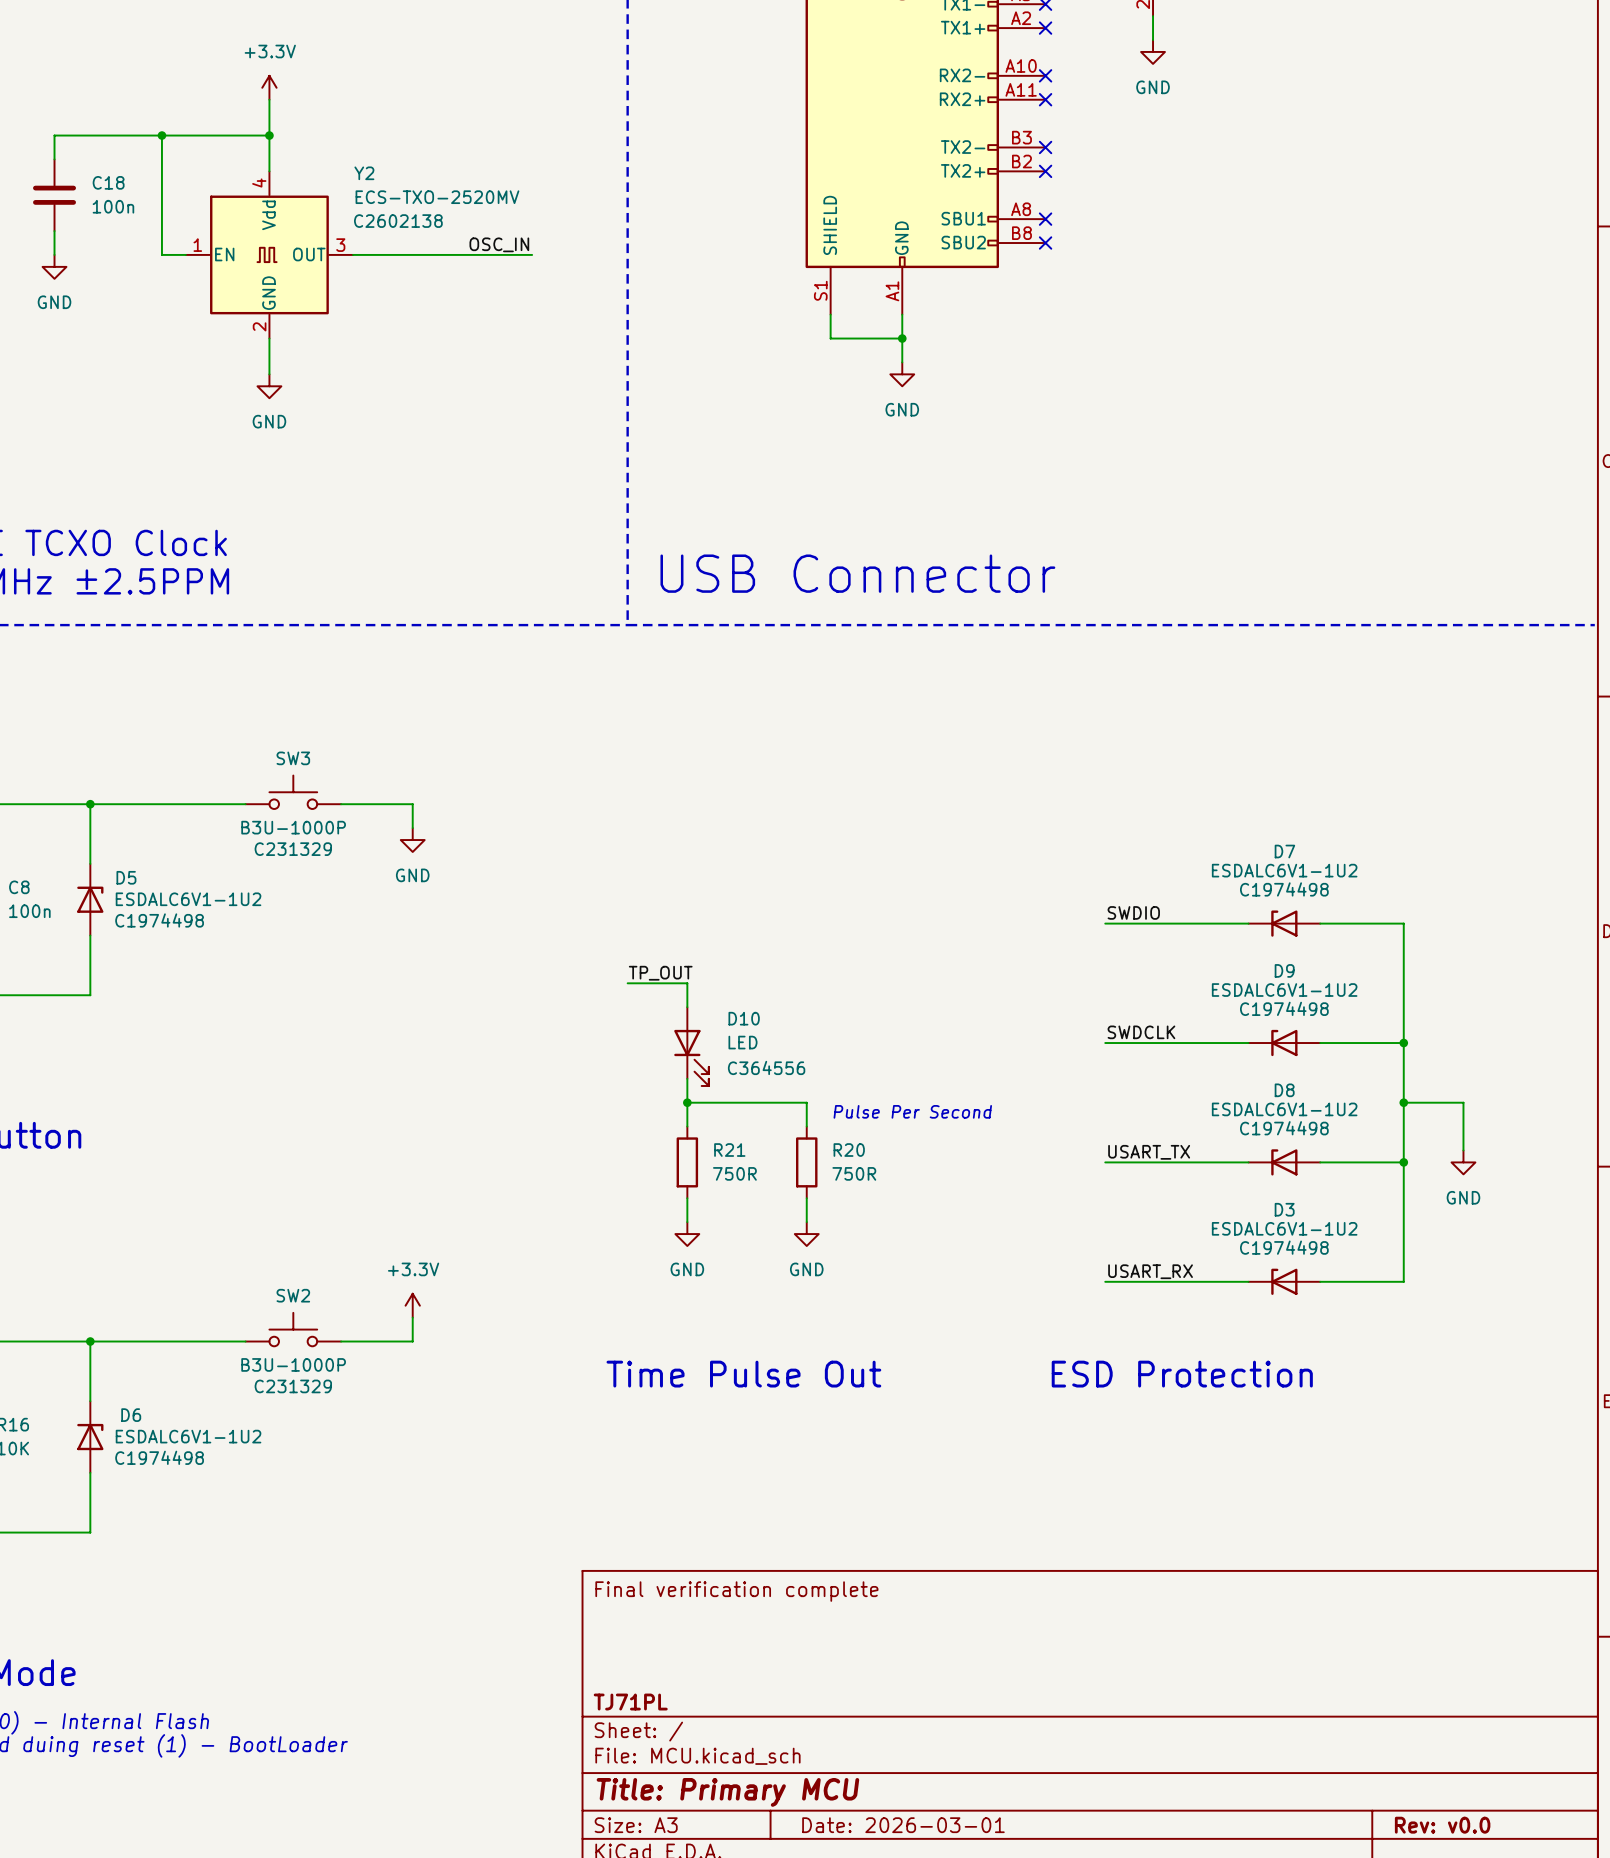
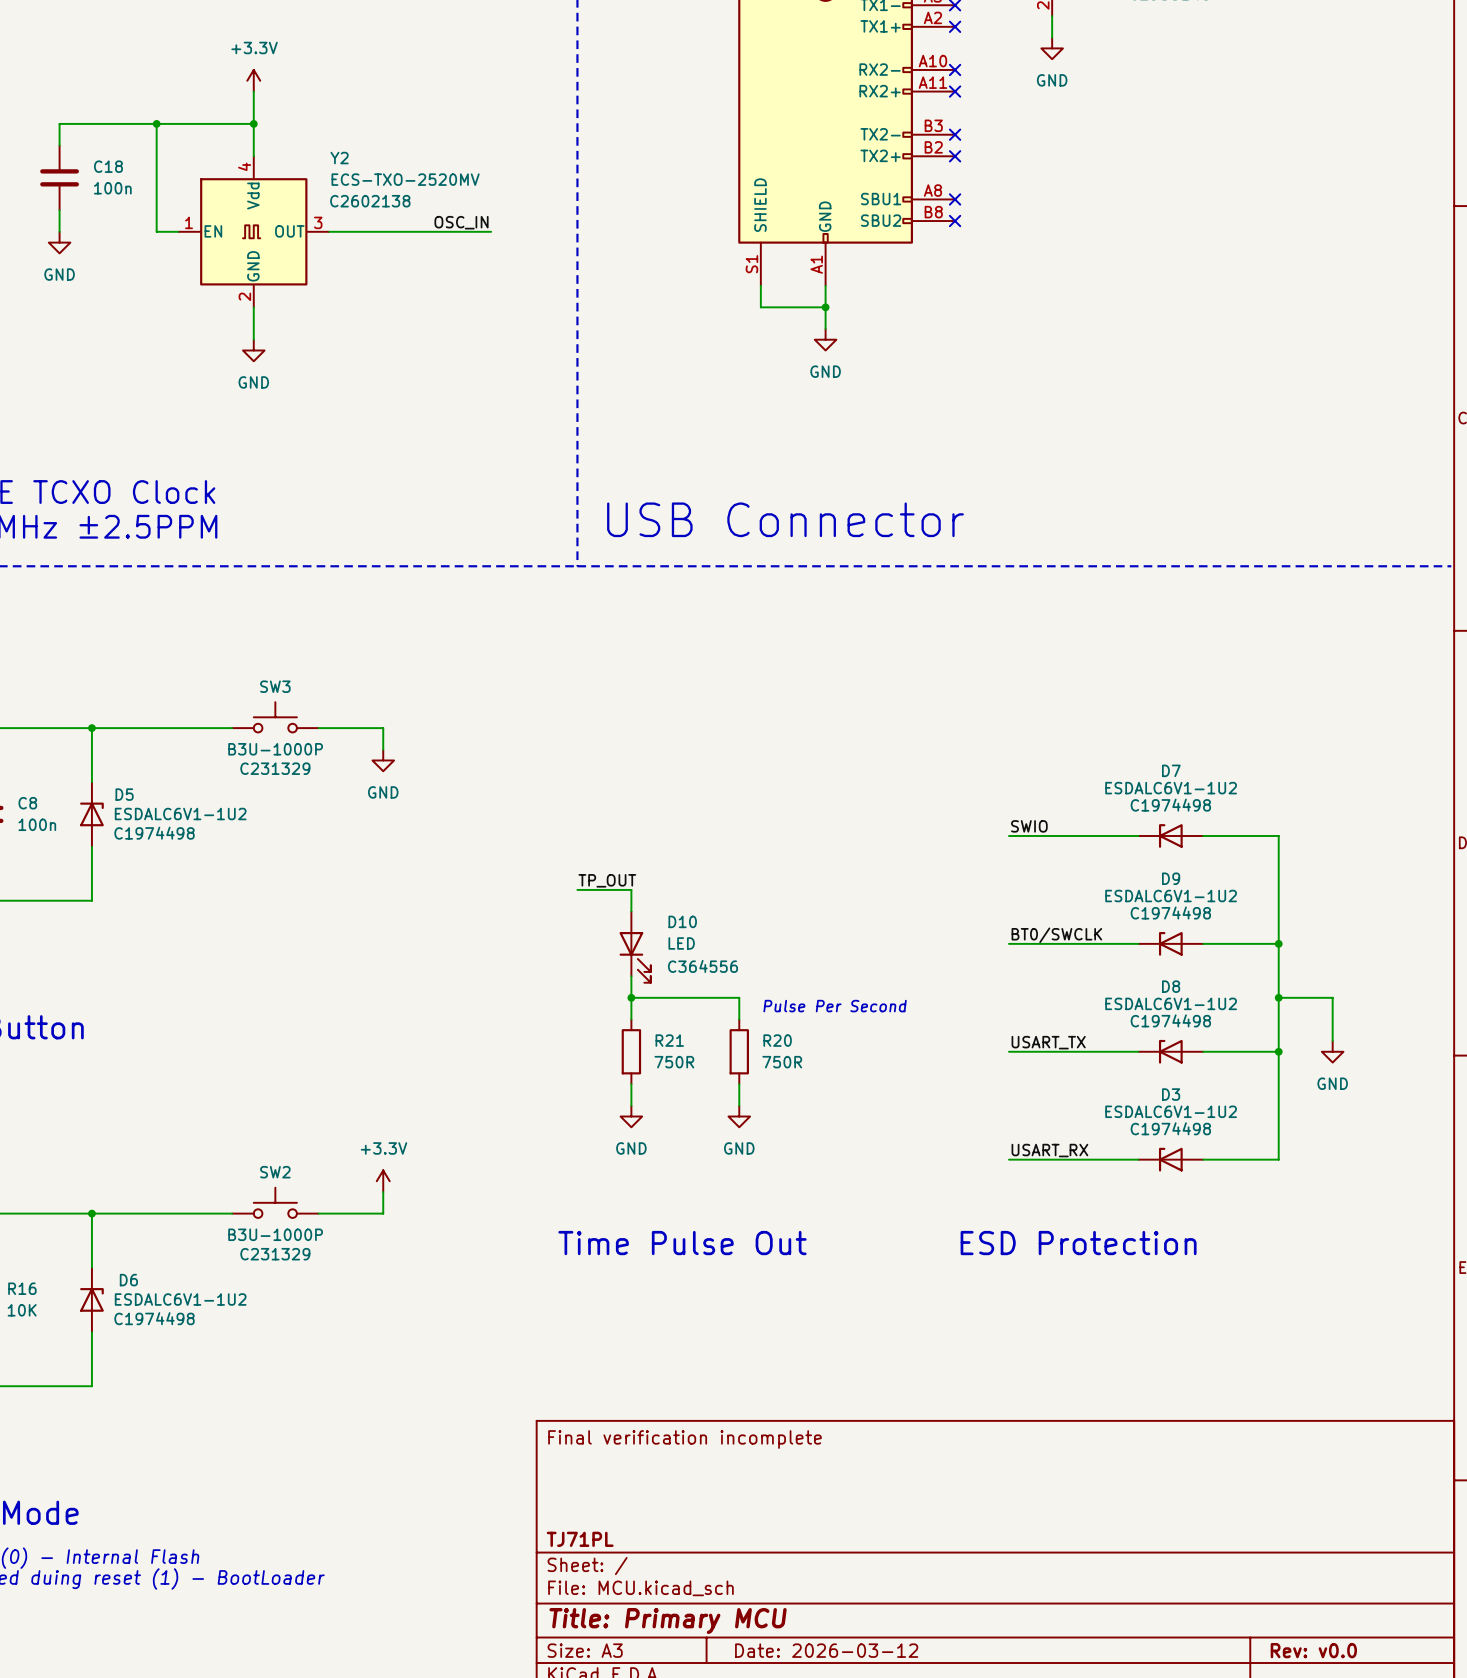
label: SWDIO (1133, 912) -> SWIO (1029, 826)
label: SWDCLK (1141, 1032) -> BT0/SWCLK (1056, 935)
title block: Final verification complete (736, 1591) -> Final verification incomplete (684, 1439)
title block: Date: 2026-03-01 (903, 1825) -> Date: 2026-03-12 (826, 1650)

